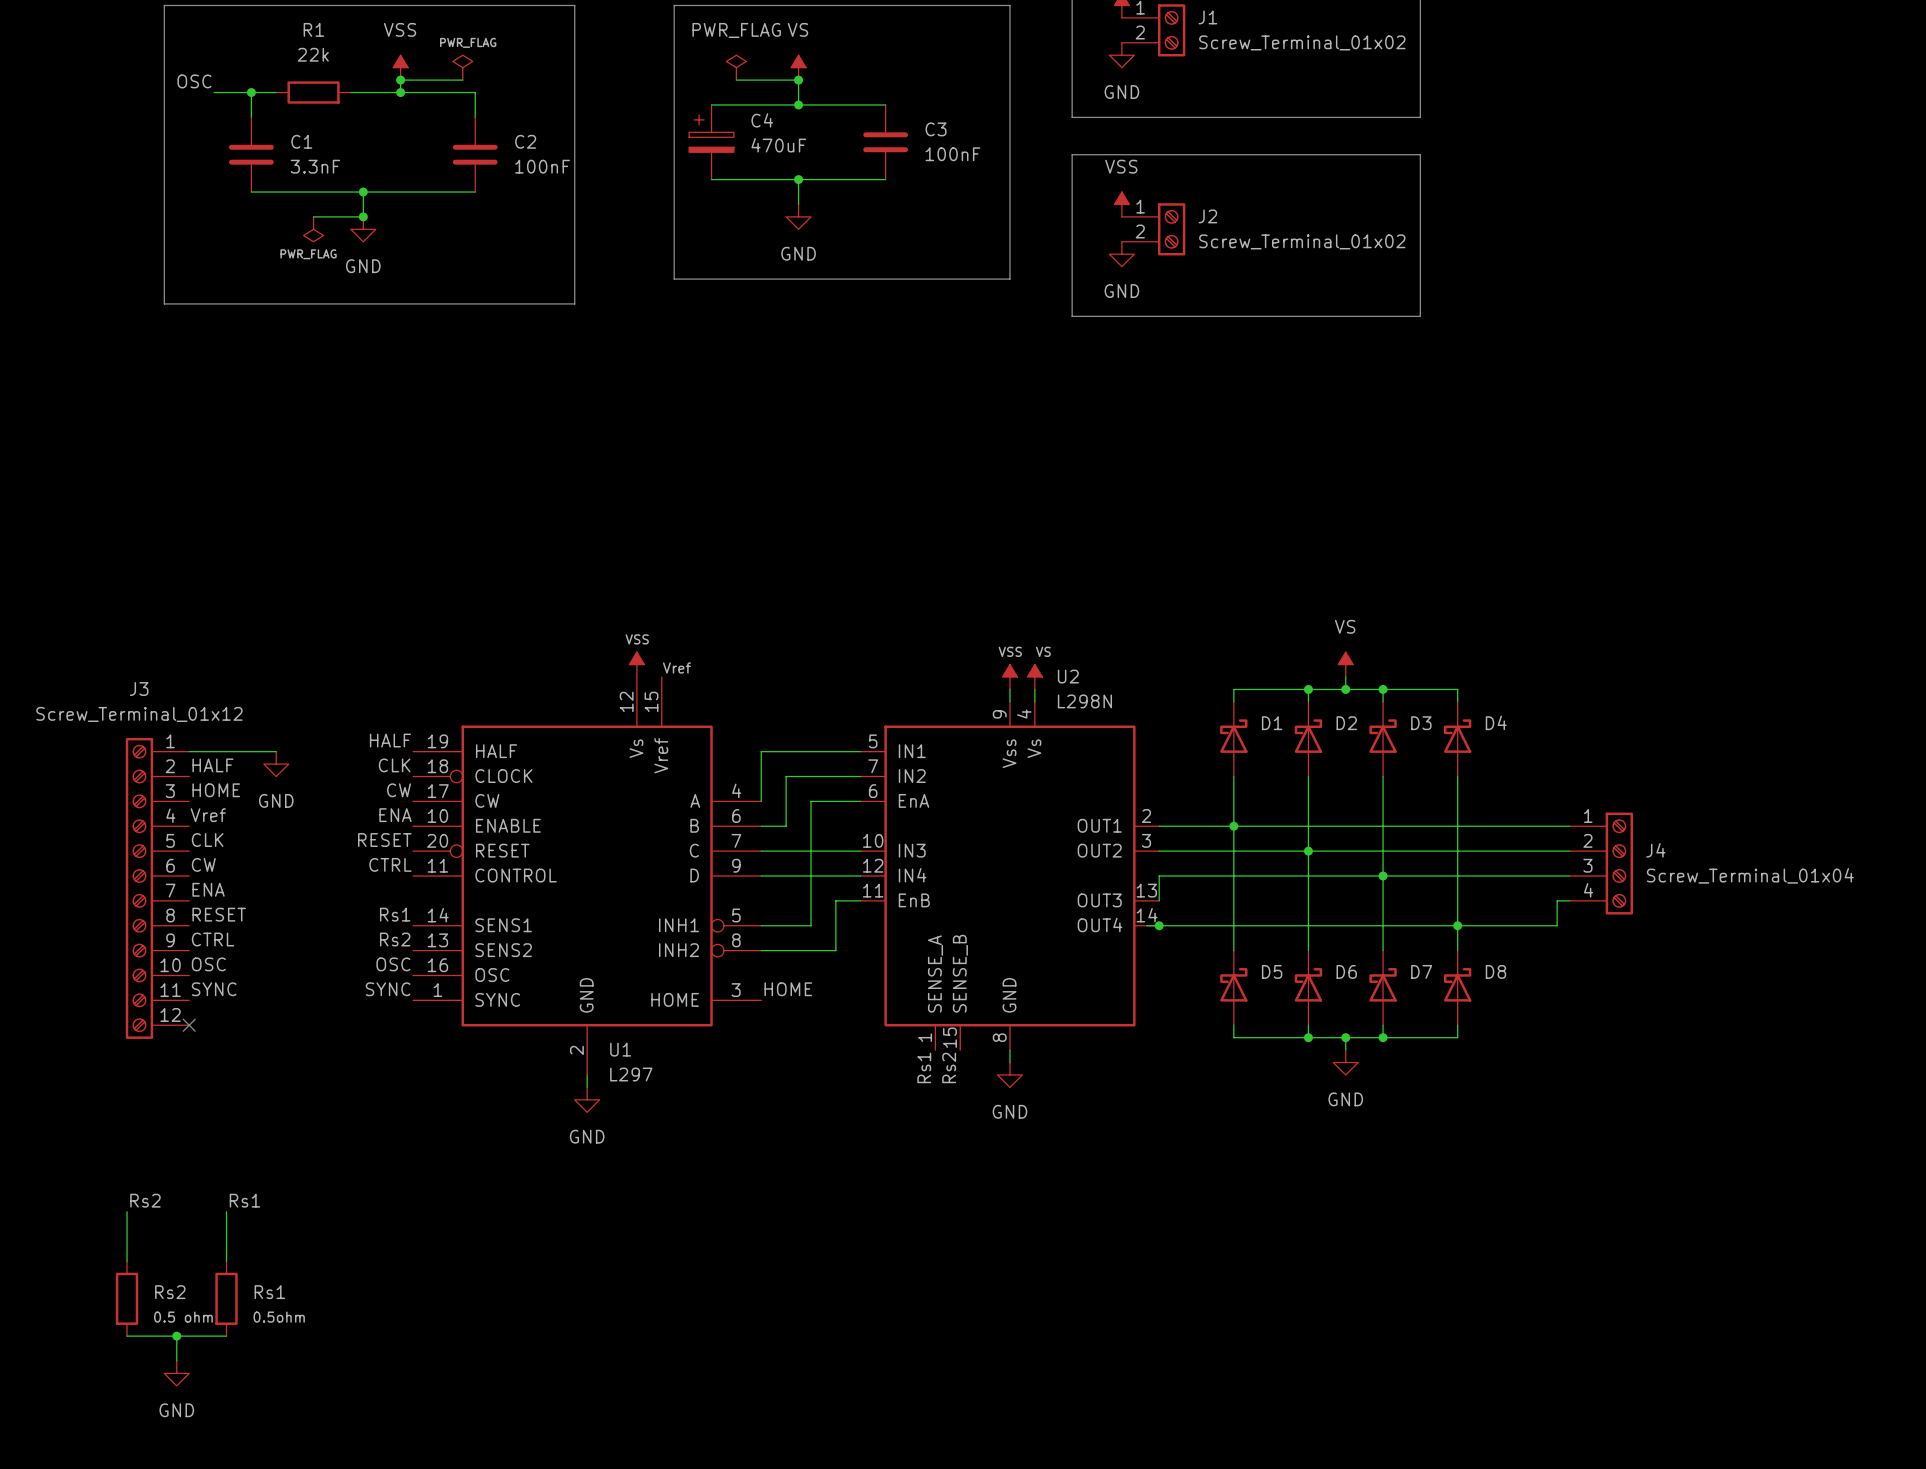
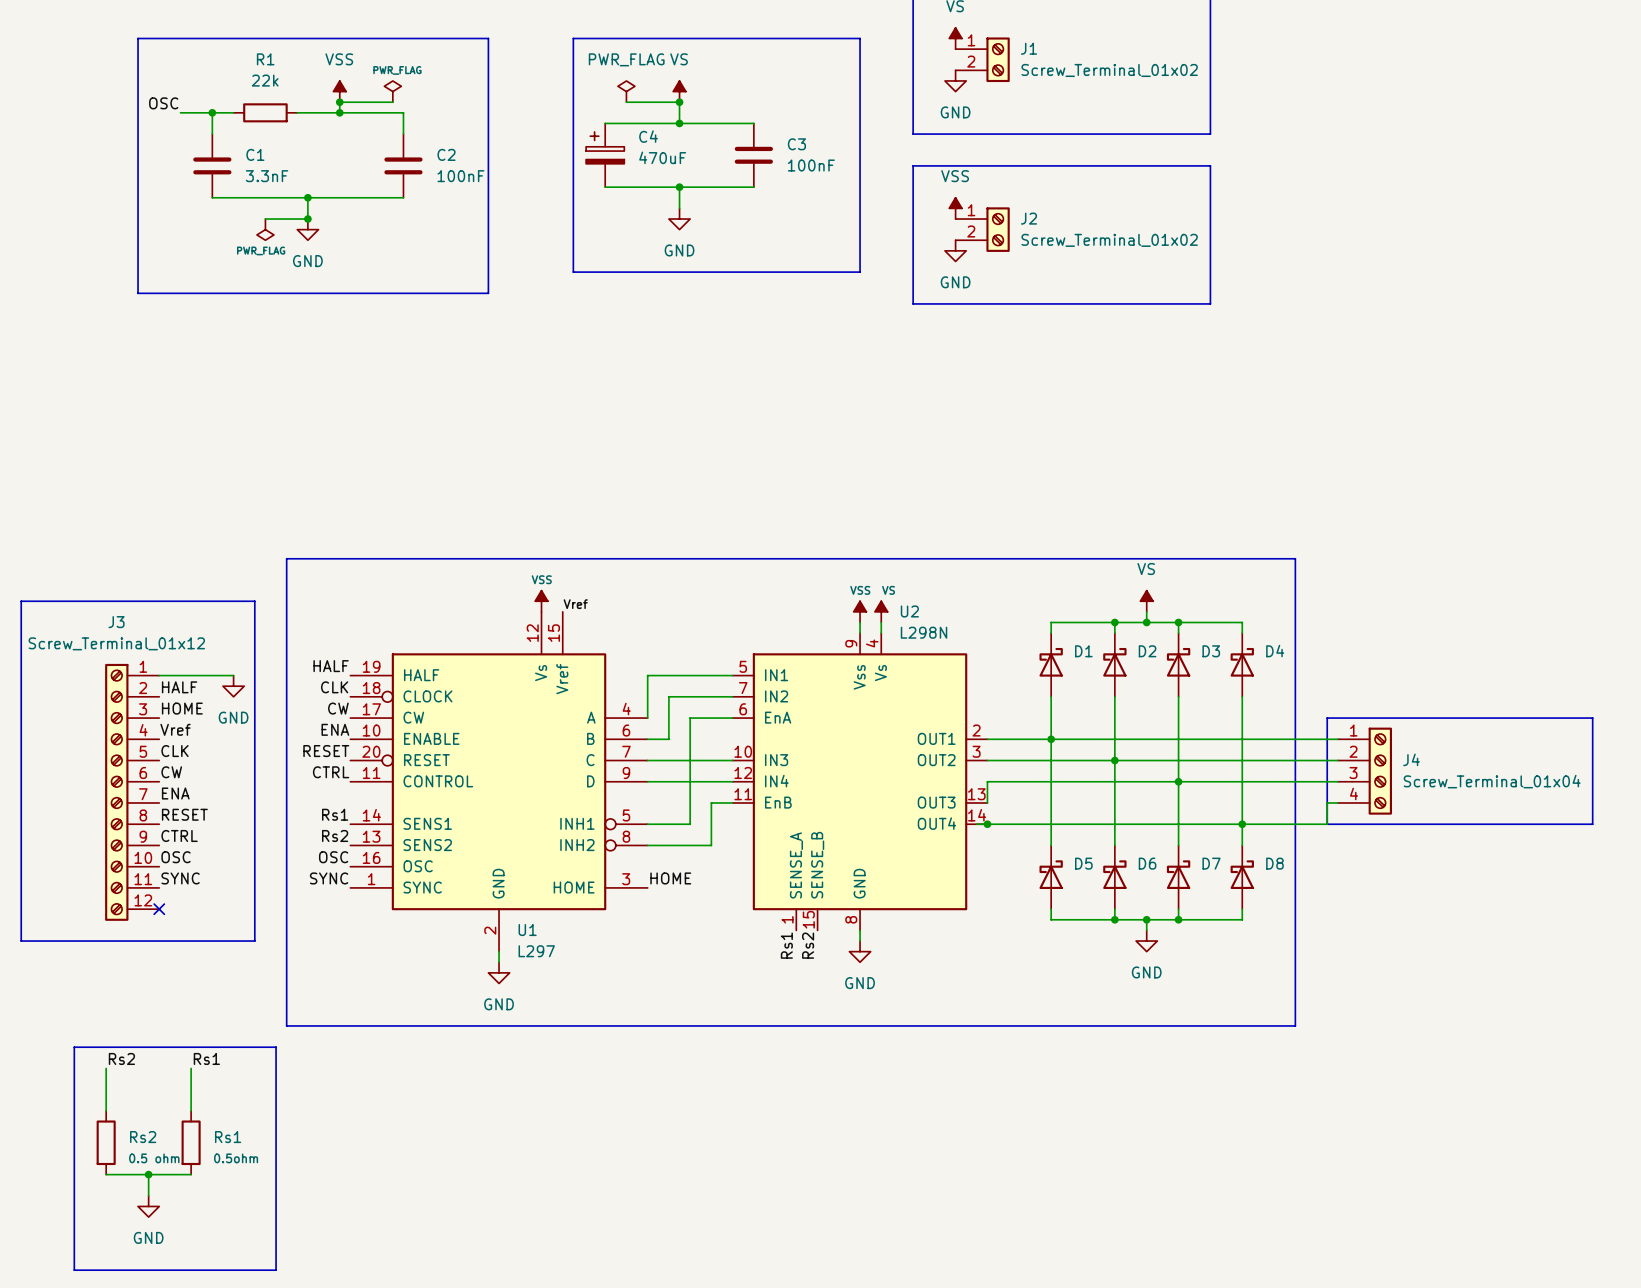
line: none -> (286, 558) (1295, 558) (1295, 1025) (286, 1025) (286, 558)
line: none -> (21, 601) (21, 941) (254, 941) (254, 601) (21, 601)
line: none -> (1327, 718) (1592, 718) (1592, 824) (1327, 824) (1327, 718)
line: none -> (74, 1047) (74, 1270) (276, 1270) (276, 1047) (74, 1047)

